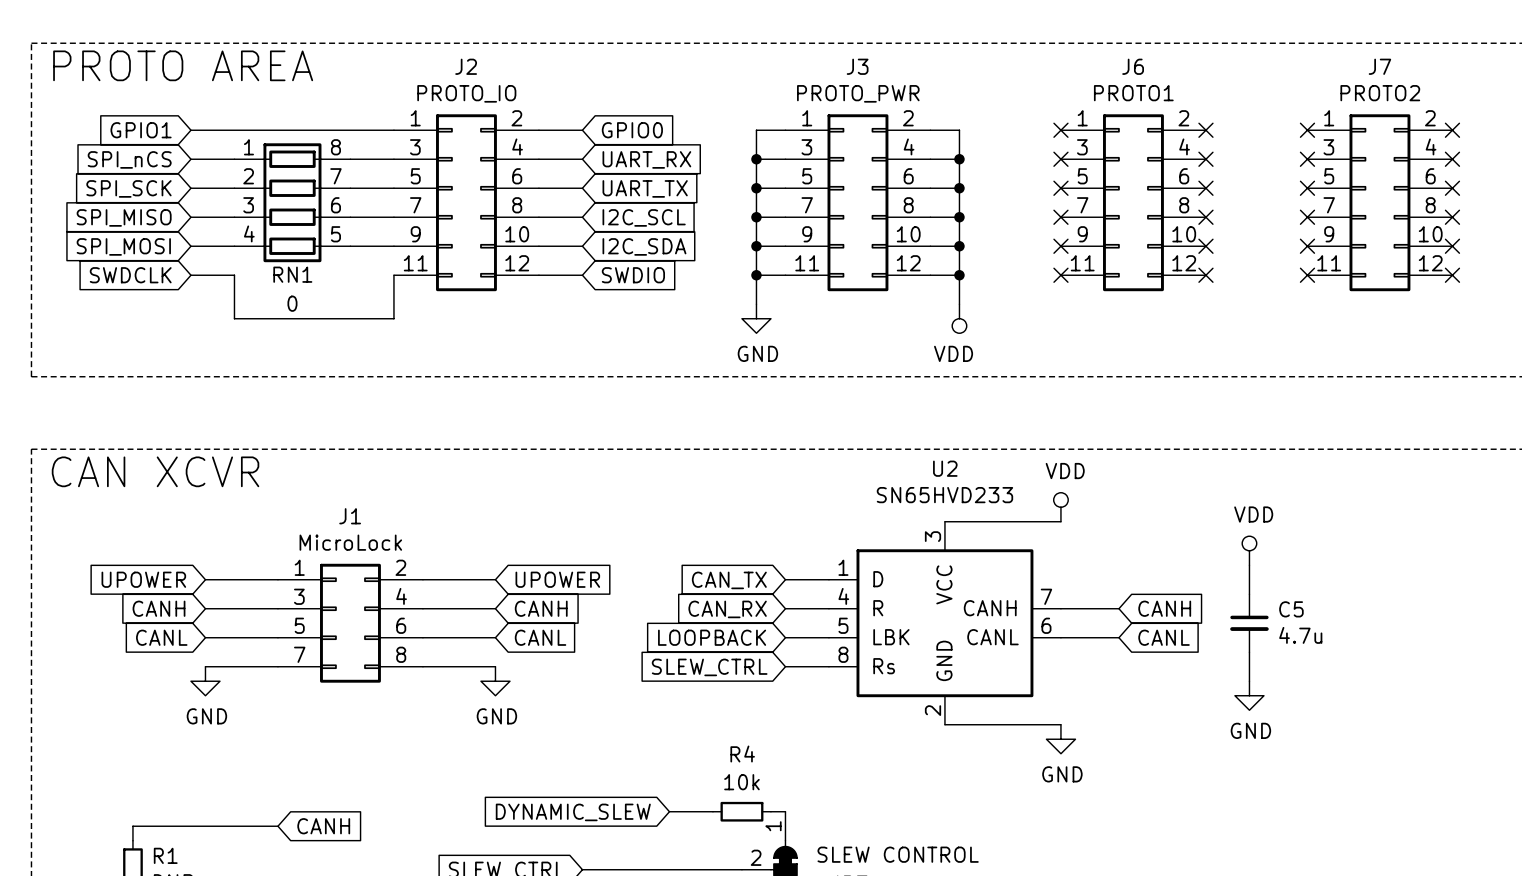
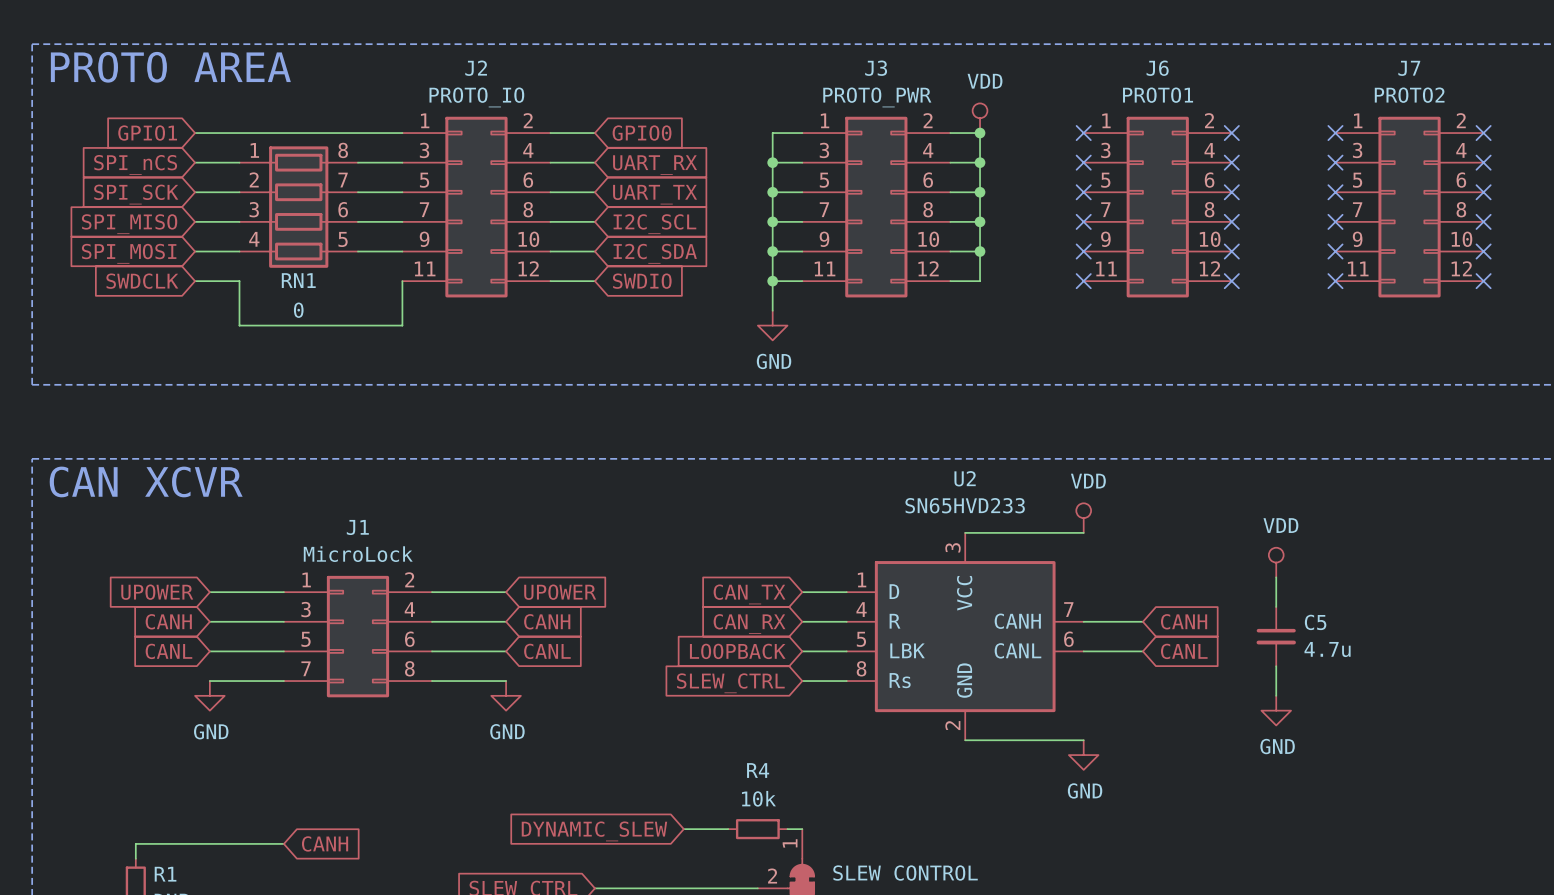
junction: none -> (980, 133)
wire: (959, 275) (959, 304) -> none
junction: (959, 275) -> none
power symbol rotation: 0° (959, 318) -> 180° (980, 118)
power symbol position: VDD (959, 318) -> VDD (980, 118)

